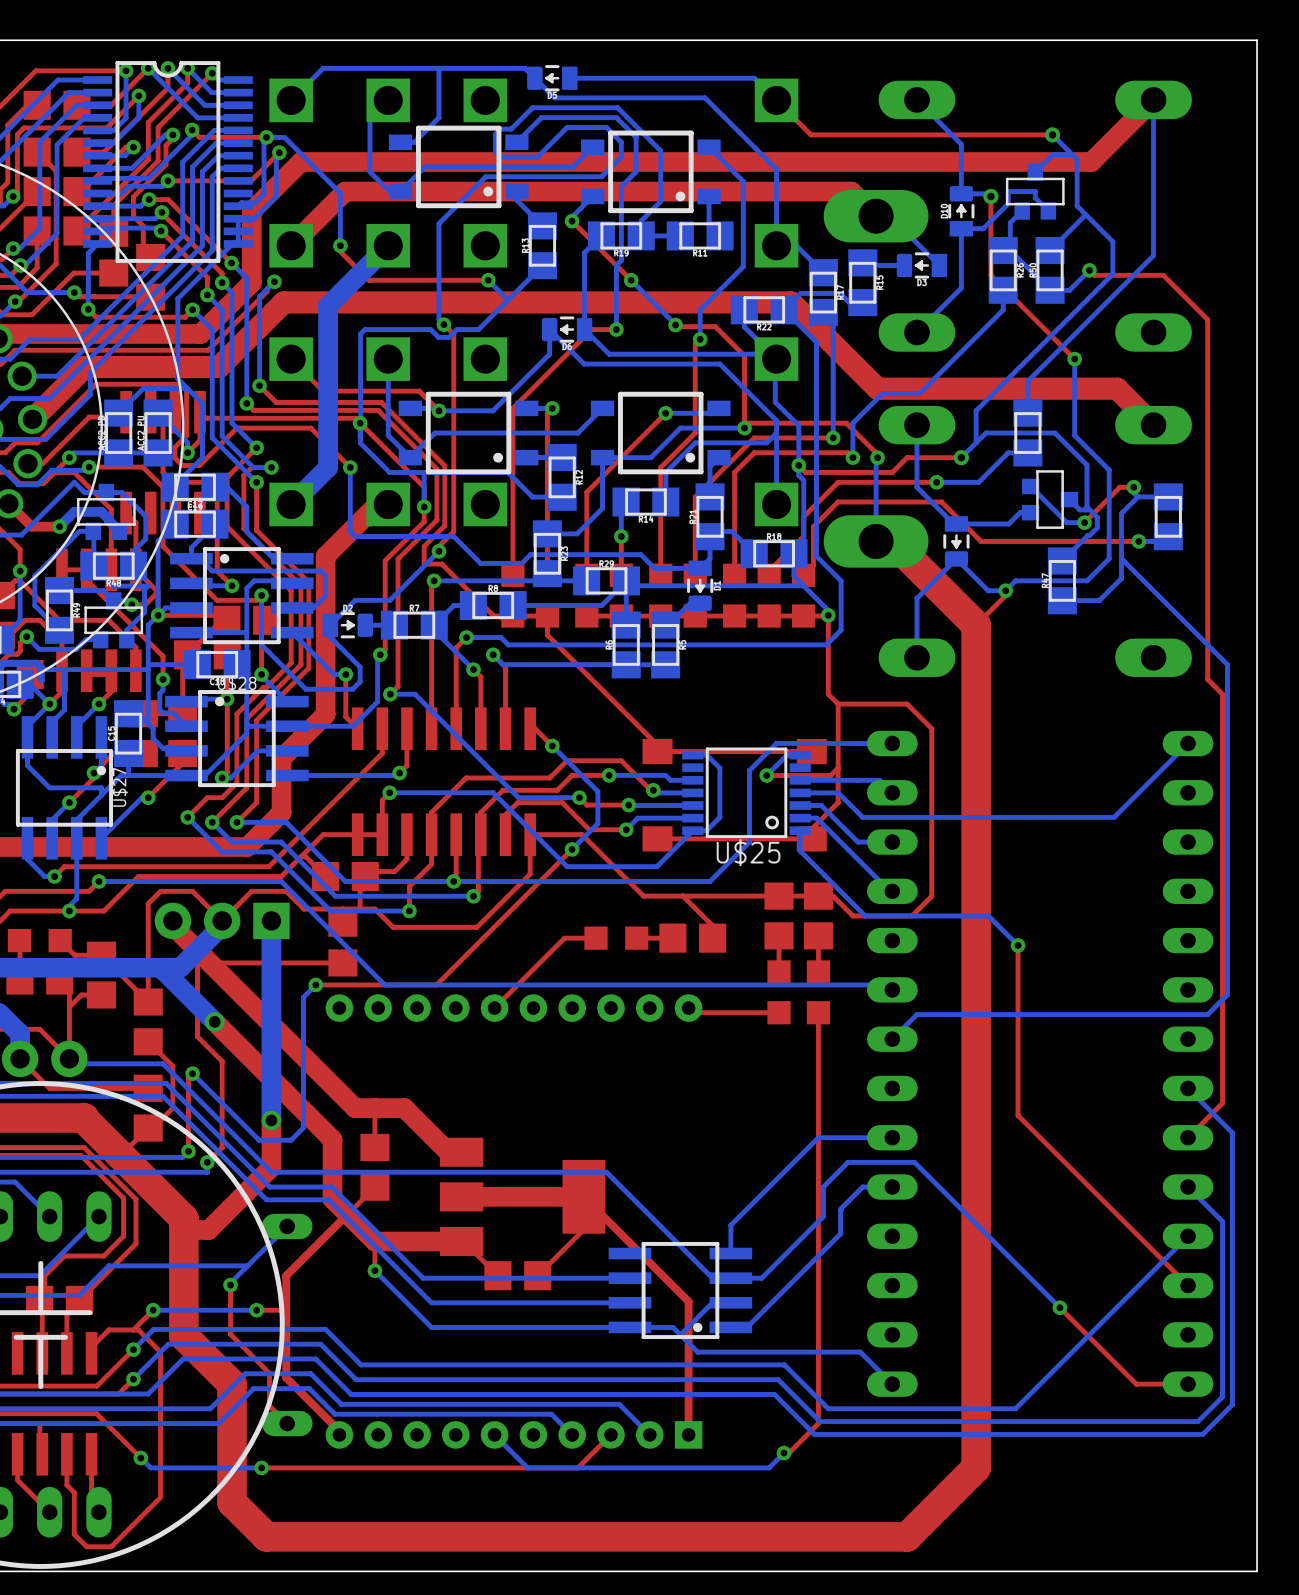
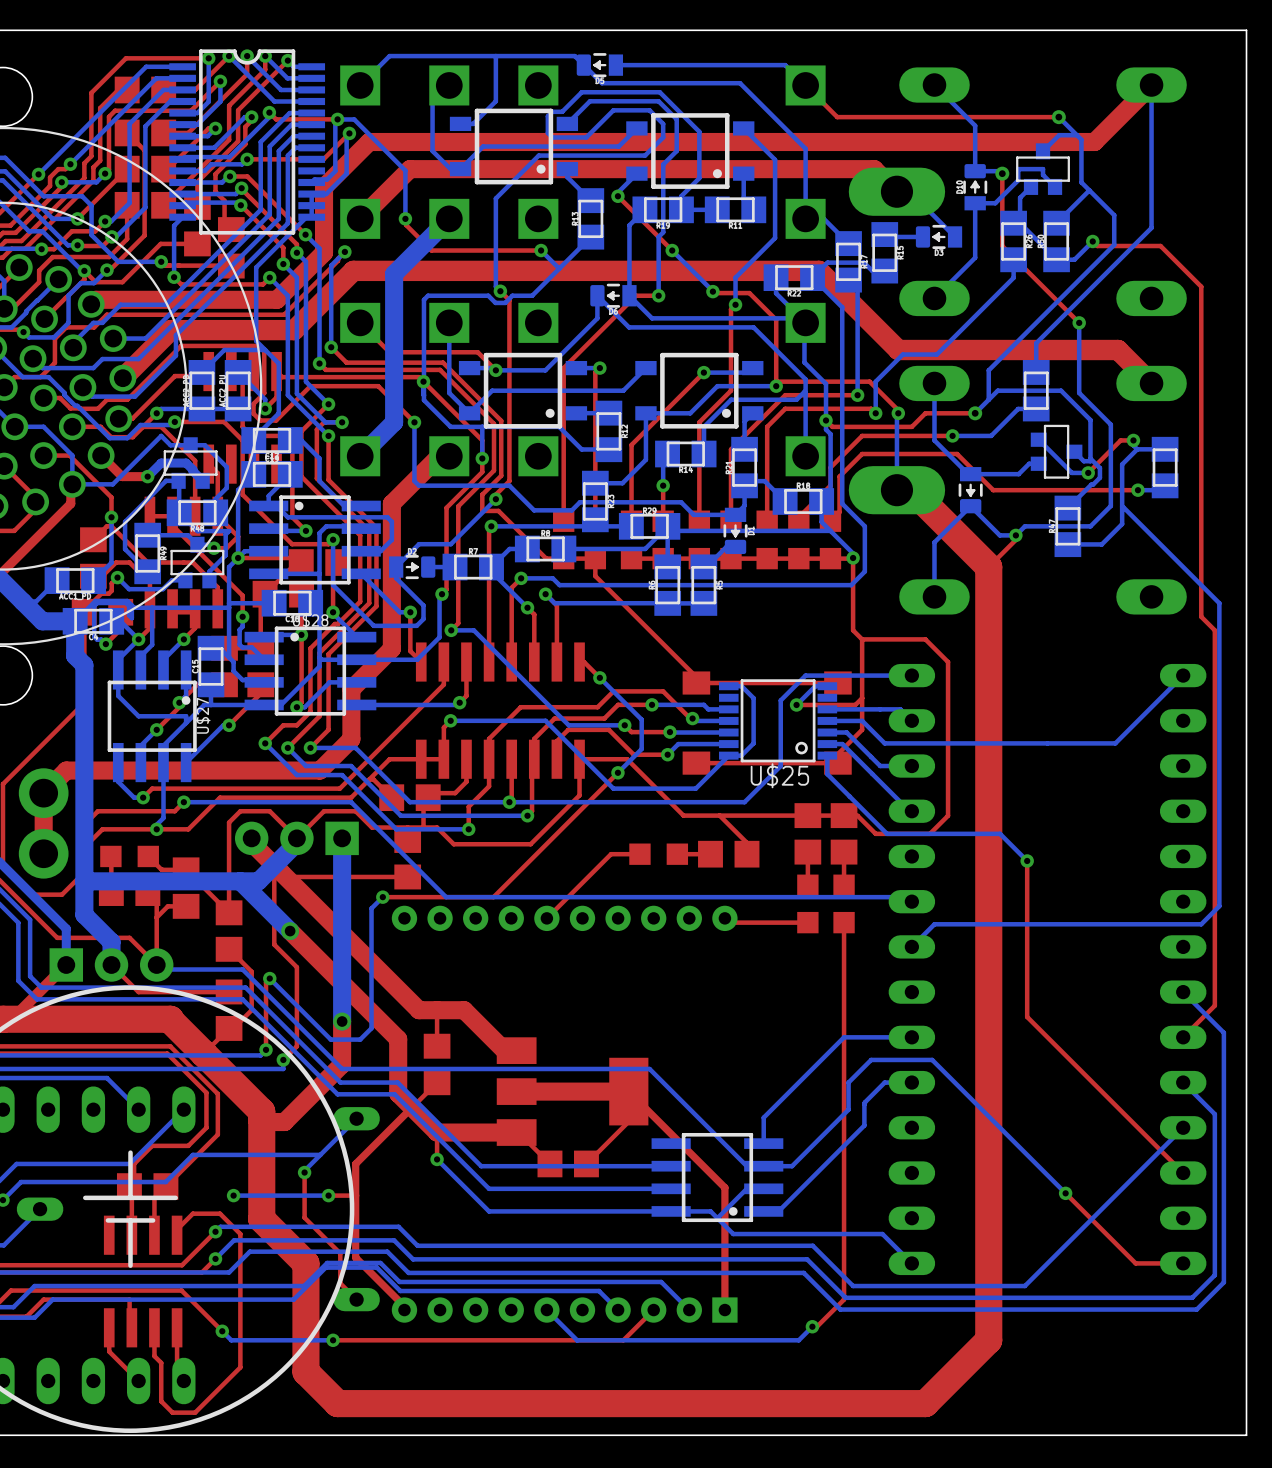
top track: (153, 1310) (133, 1329) -> none
bottom track: (138, 1344) (153, 1329) (325, 1329) (361, 1364) -> none
bottom track: (168, 1344) (153, 1358) -> (247, 1226) (220, 1226)
bottom track: (320, 1344) (356, 1379) -> (387, 1226) (398, 1226) (417, 1245) (424, 1245)
bottom track: (183, 1358) (170, 1371) -> (261, 1240) (234, 1240)
bottom track: (315, 1358) (351, 1394) -> (382, 1240) (394, 1240) (413, 1259) (419, 1259)
bottom track: none -> (249, 1251) (387, 1251) (408, 1272) (415, 1272)
bottom track: (341, 1404) (310, 1373) (245, 1373) (210, 1408) -> (406, 1281) (399, 1281) (380, 1262) (327, 1262) (304, 1286) (286, 1286)

